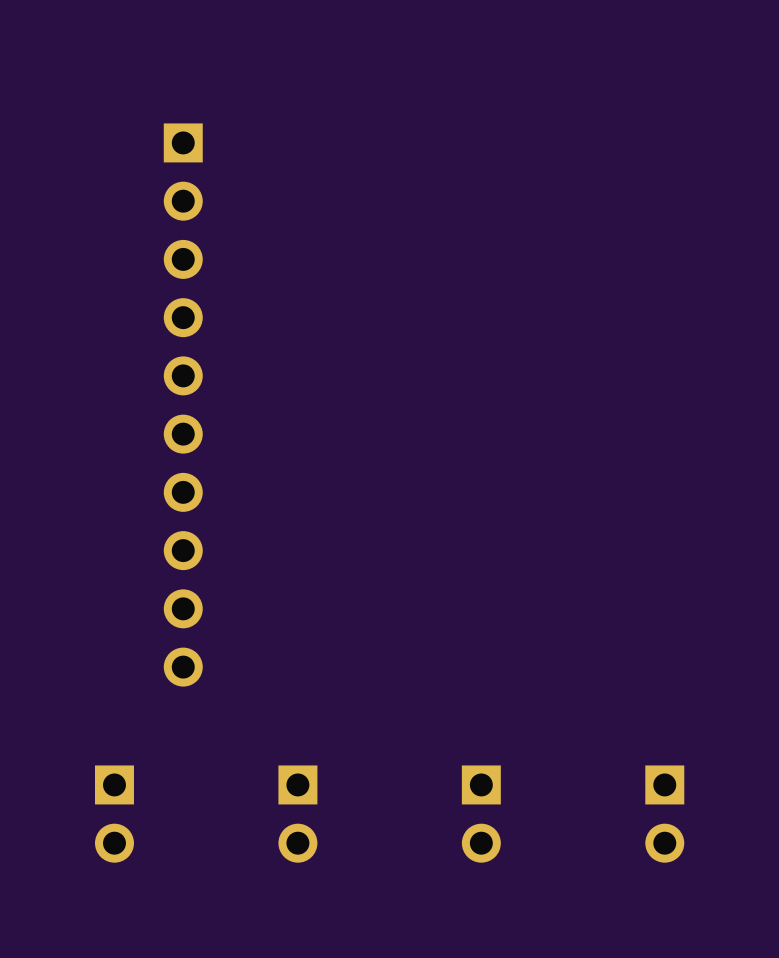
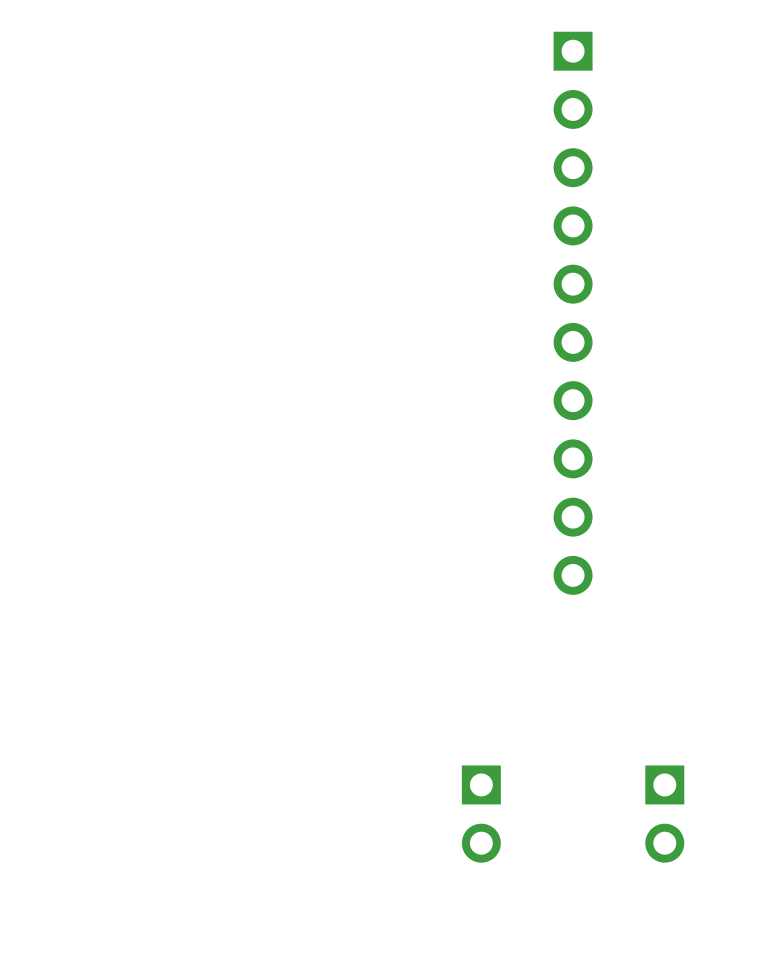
part position: (183, 405) -> (573, 313)
part: (114, 814) -> none
part: (297, 814) -> none

